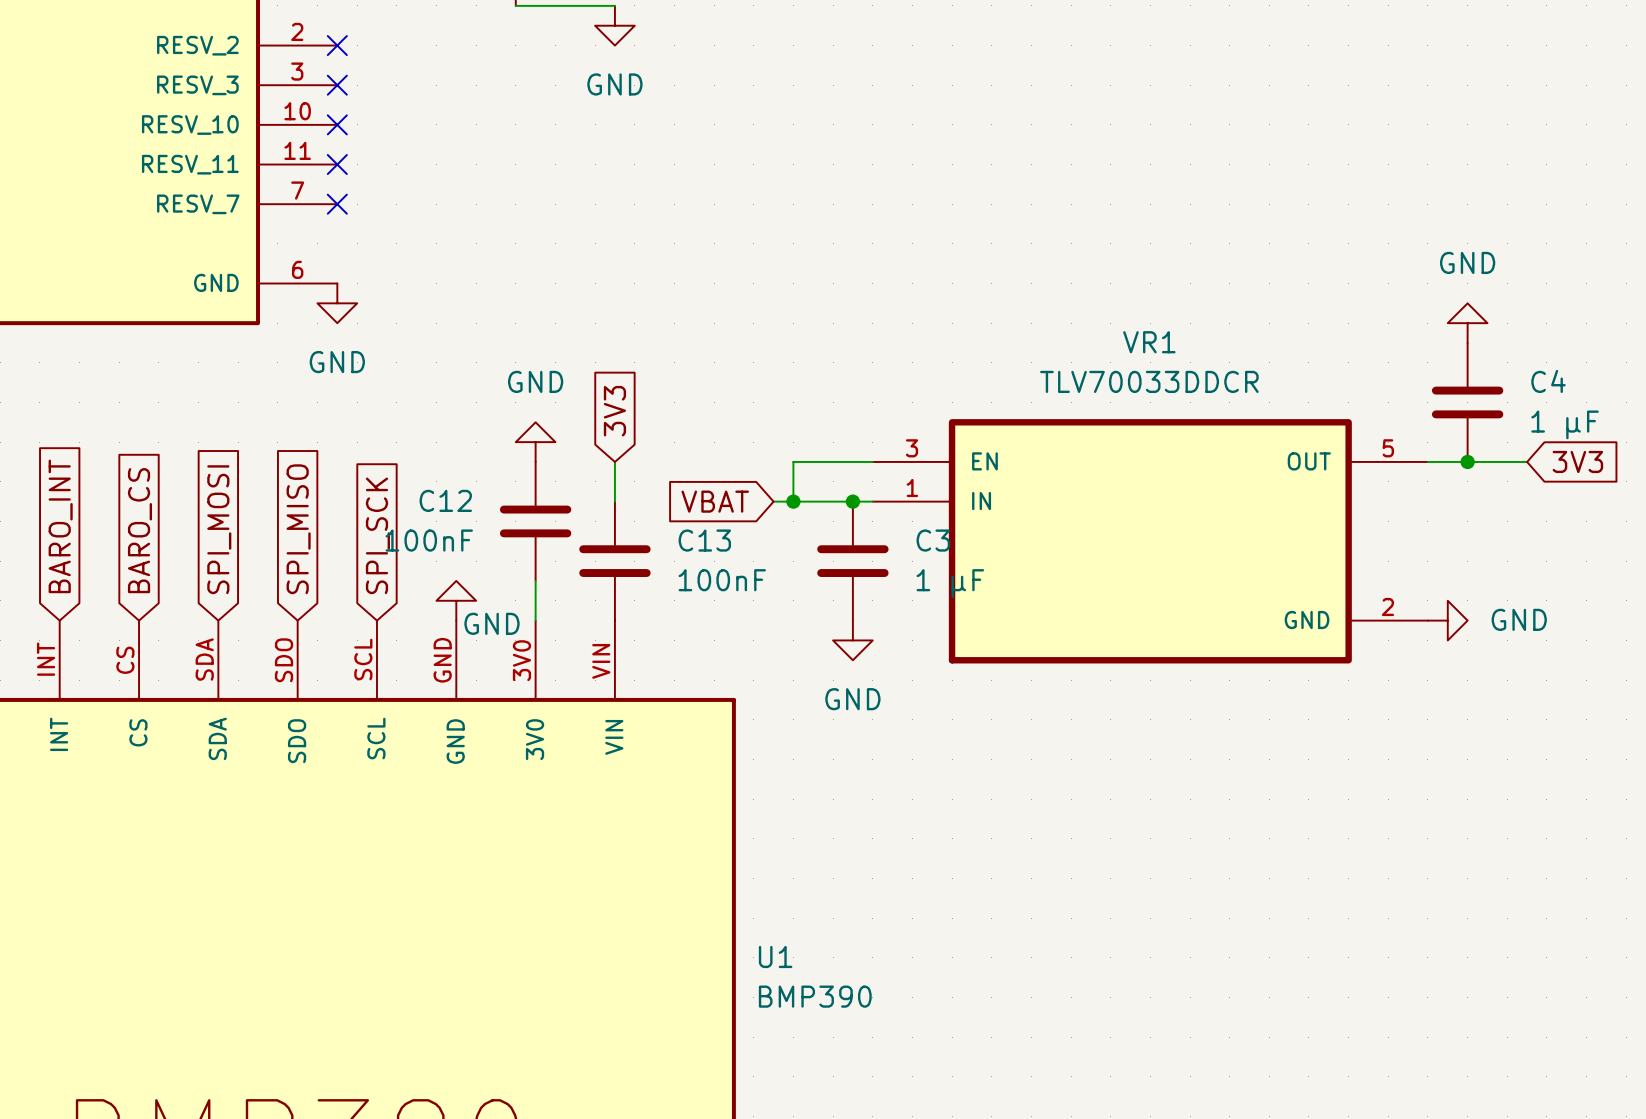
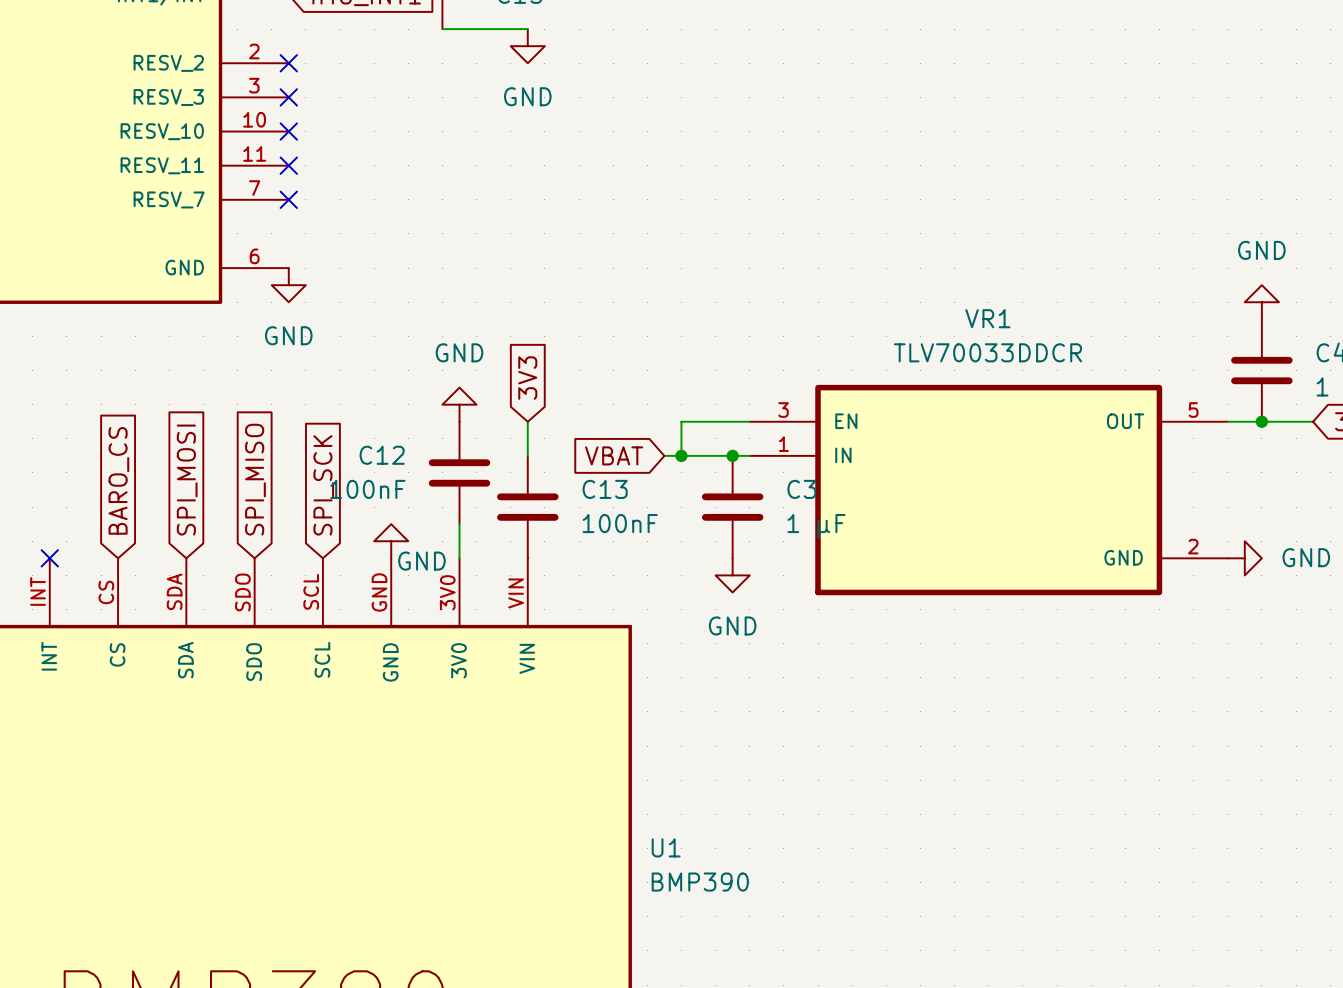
global label: BARO_INT (60, 526) -> none
no-connect mark: none -> (49, 558)

